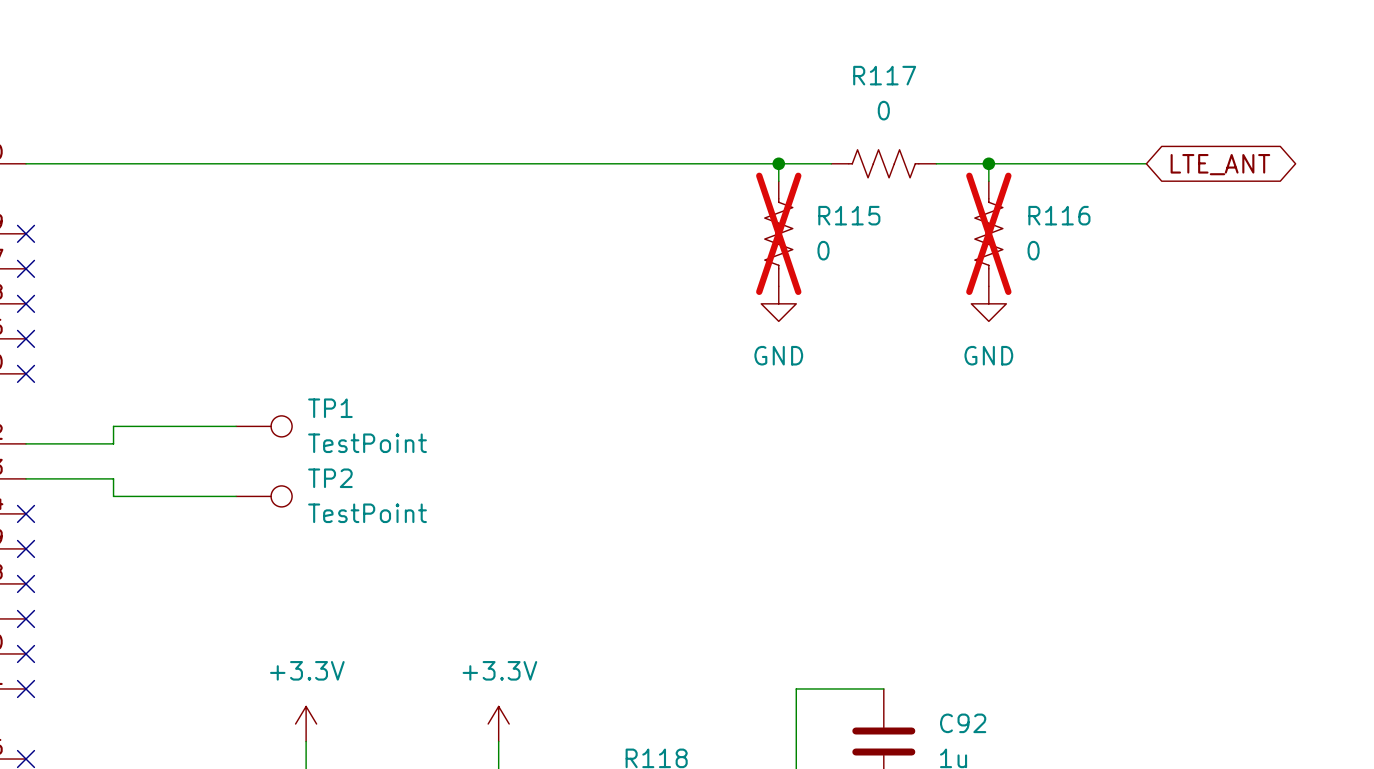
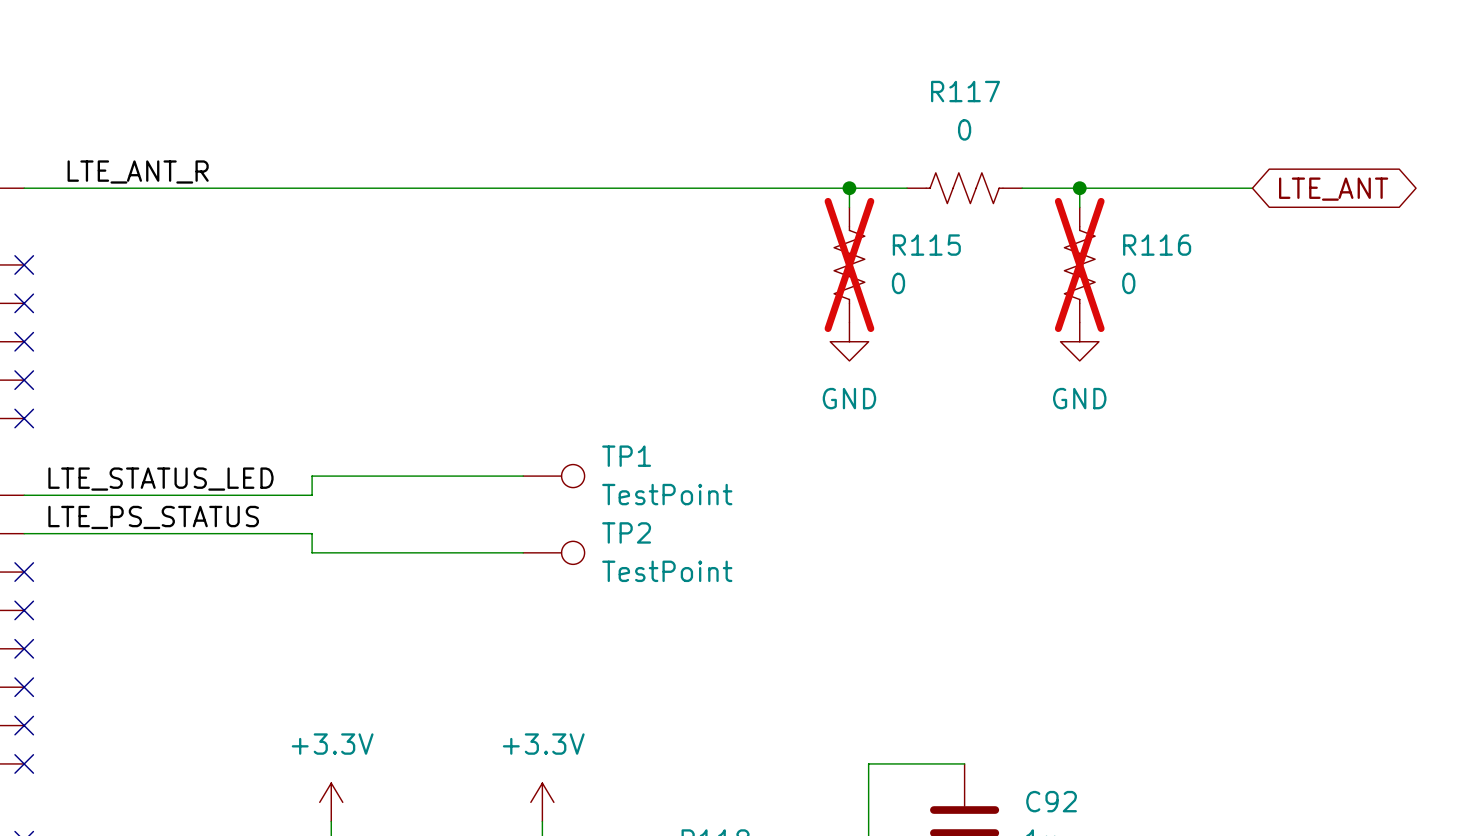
label: none -> LTE_ANT_R (138, 171)
wire: (236, 426) (113, 426) (113, 443) -> (523, 476) (312, 476) (312, 495) (120, 495)
TP1 position: (264, 426) -> (553, 476)
label: none -> LTE_STATUS_LED (160, 479)
label: none -> LTE_PS_STATUS (153, 517)
wire: (113, 478) (113, 496) (236, 496) -> (120, 533) (312, 533) (312, 552) (523, 552)
TP2 position: (264, 496) -> (553, 552)

